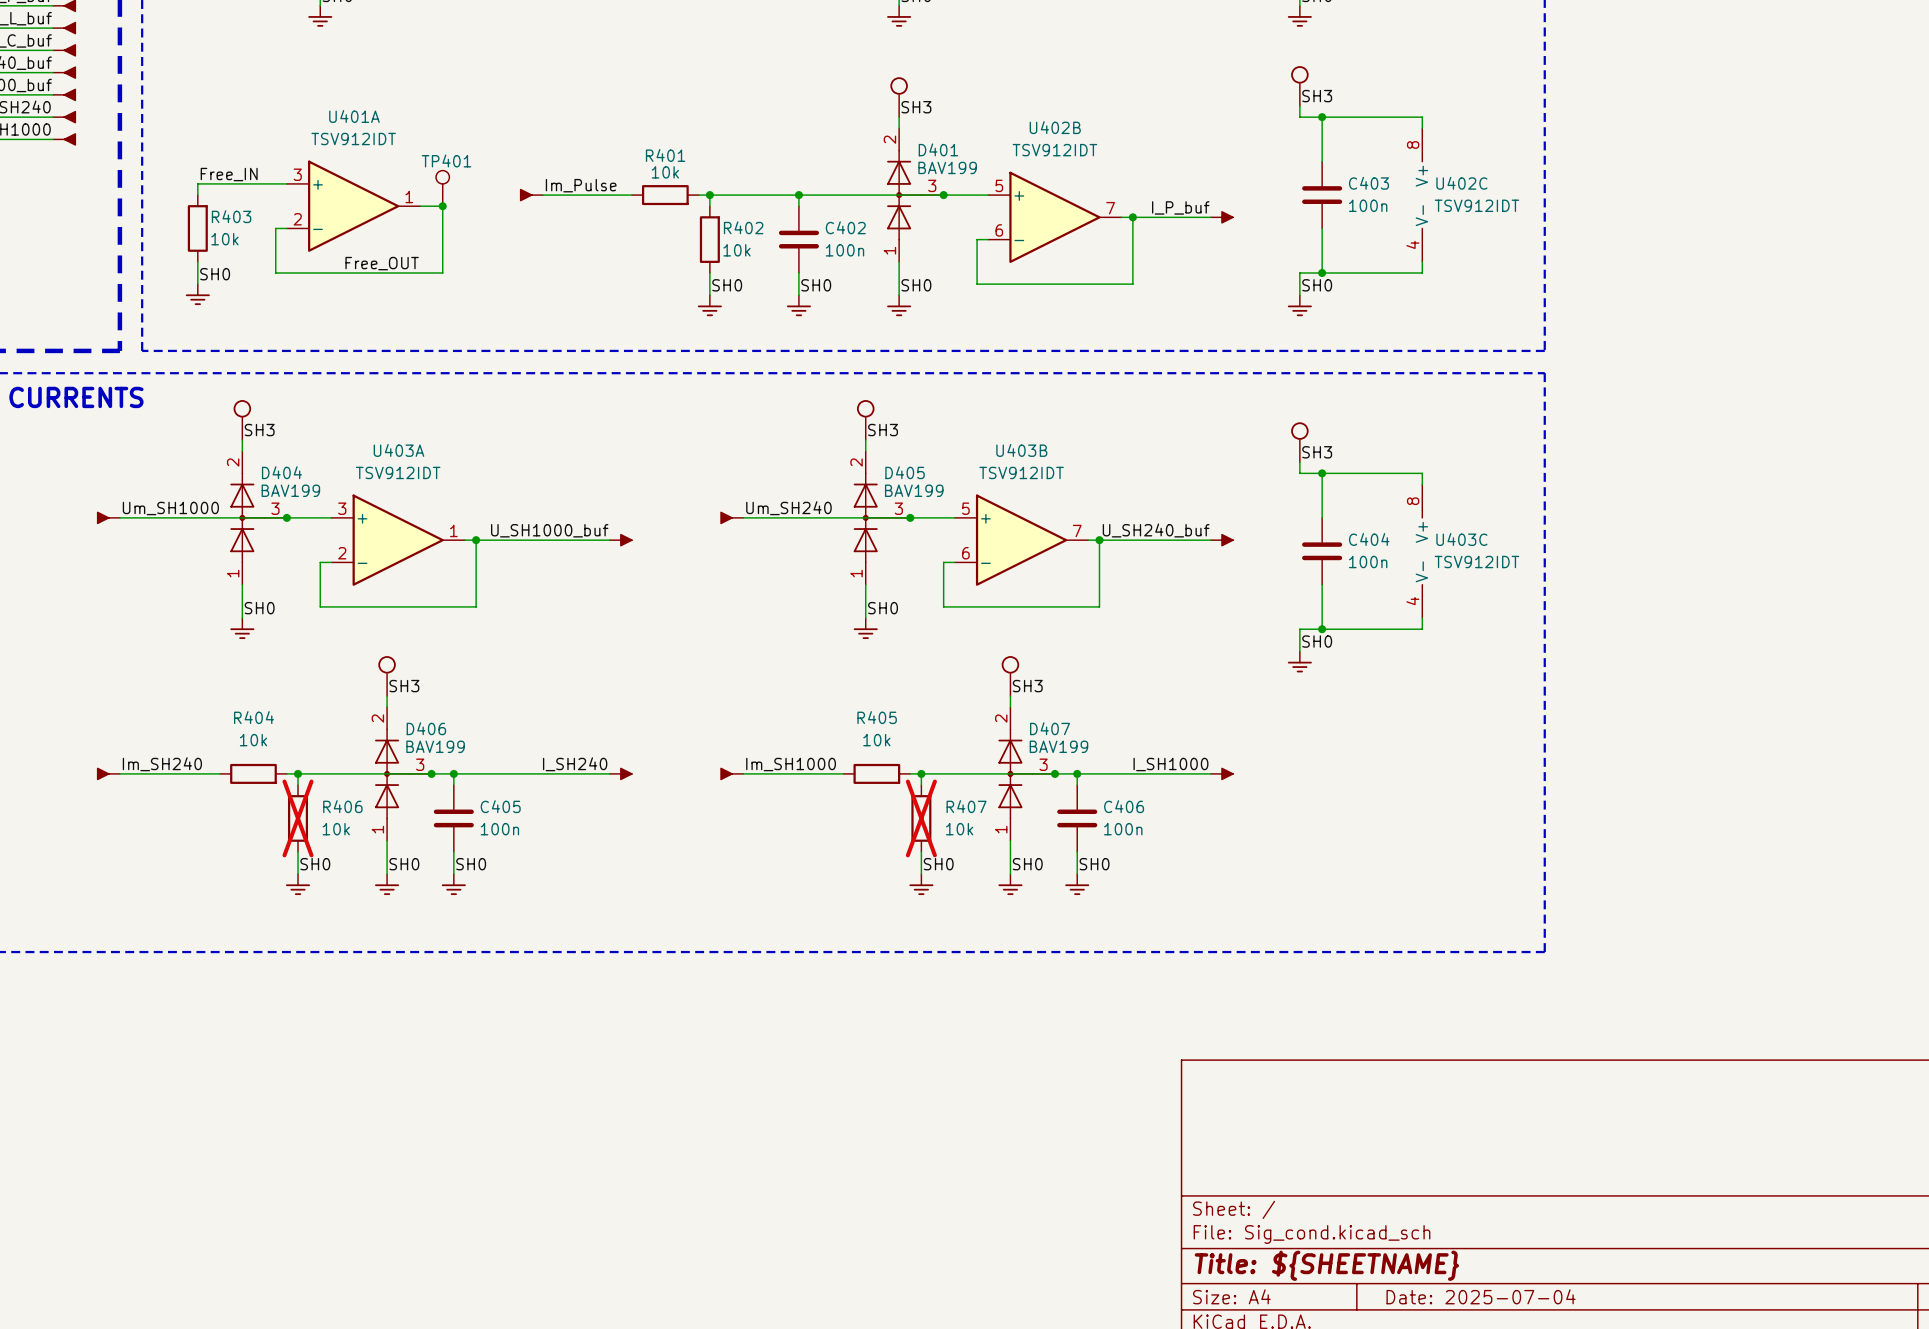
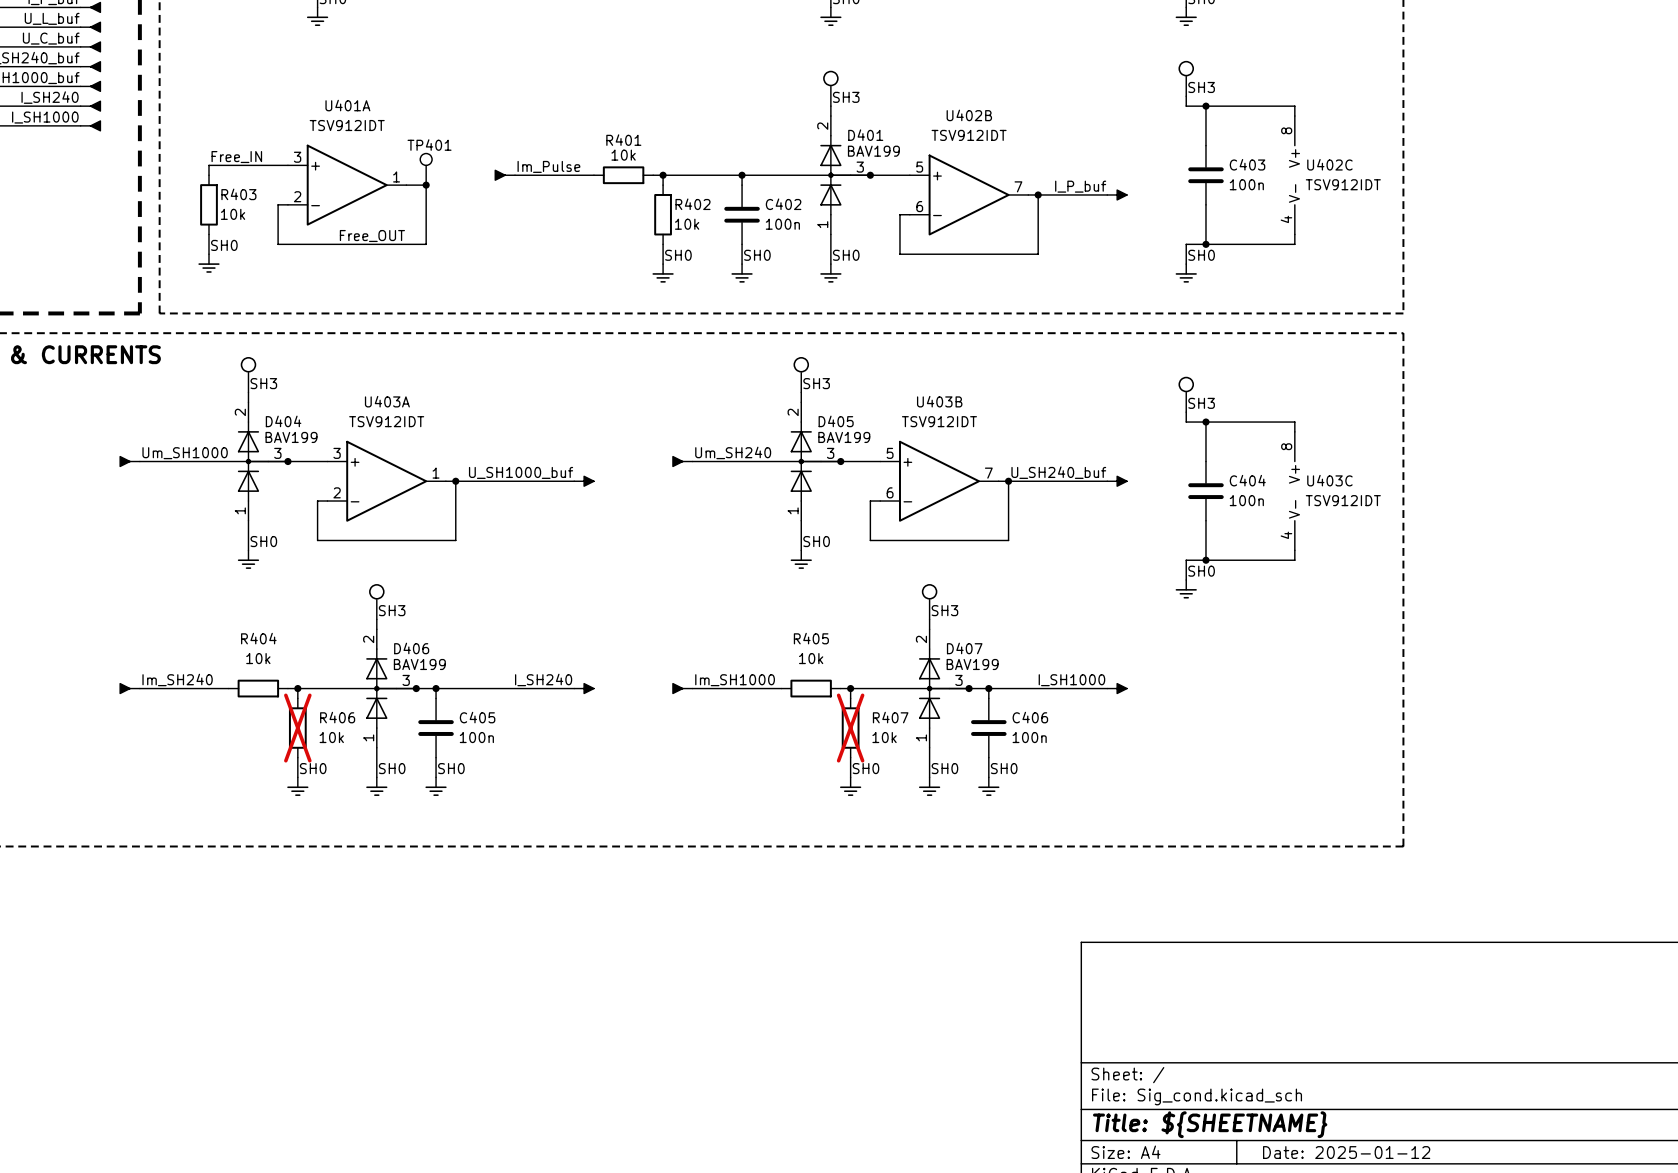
title block: Date: 2025-07-04 (1481, 1296) -> Date: 2025-01-12 (1346, 1152)

